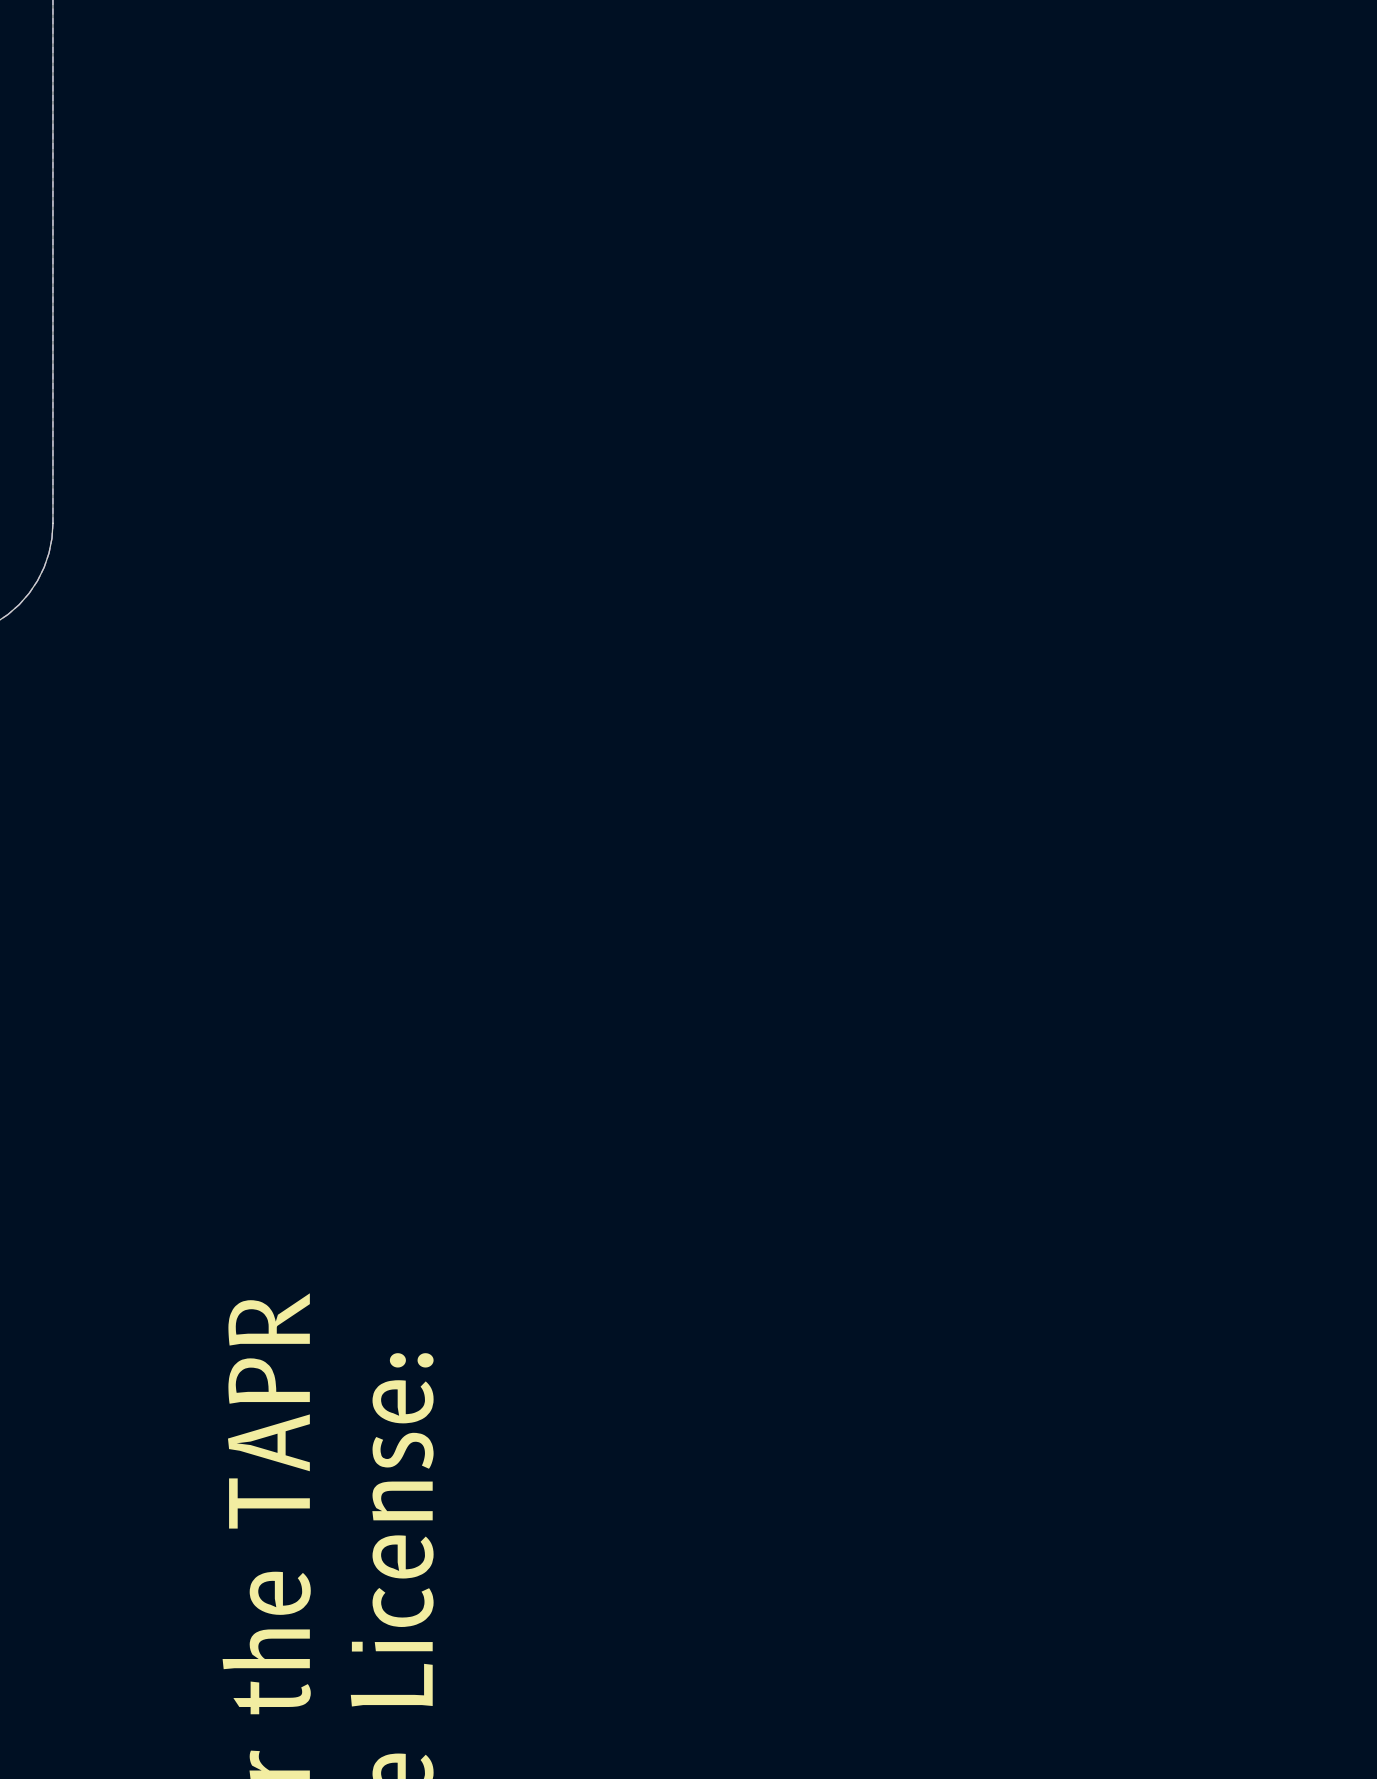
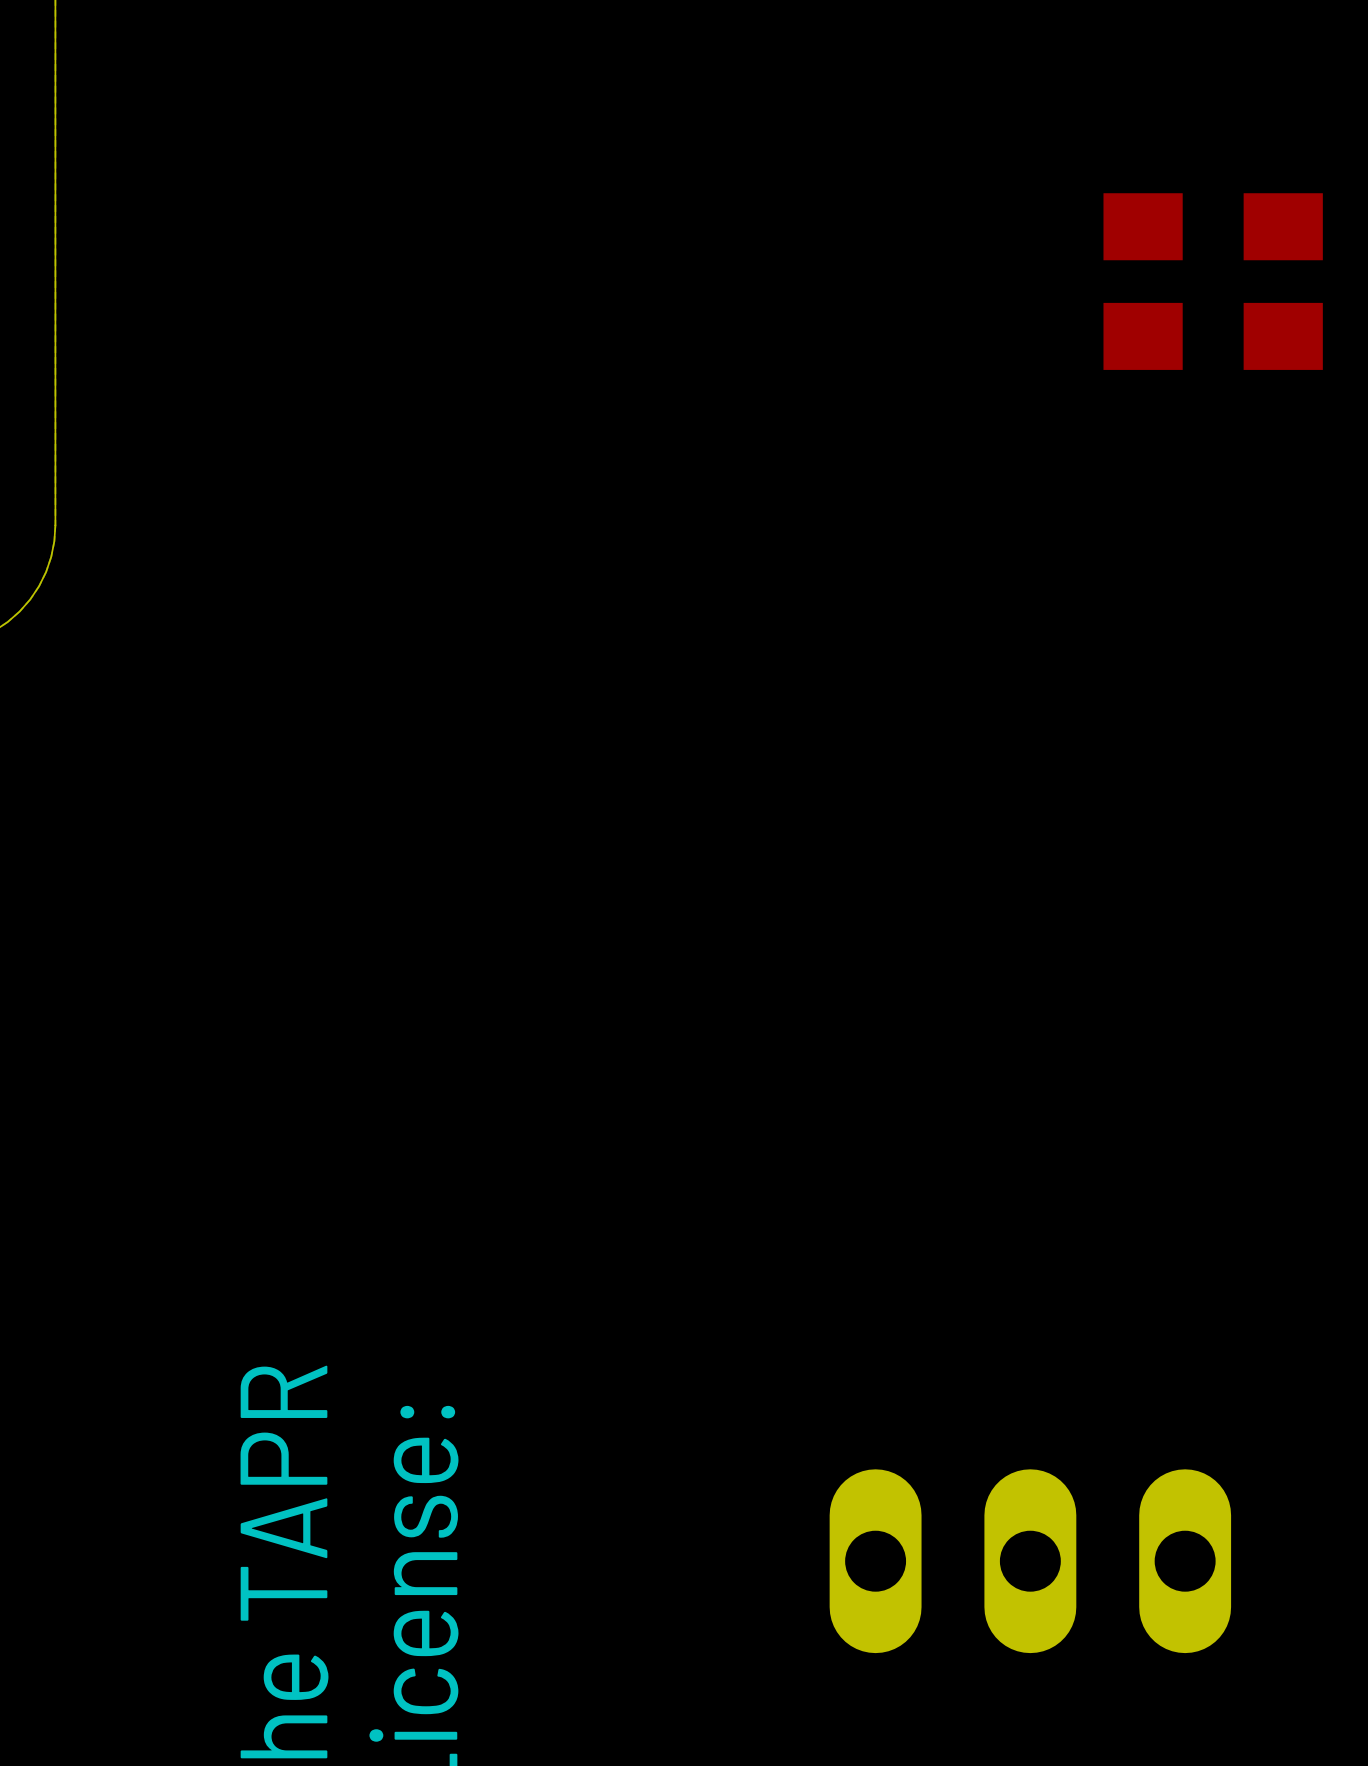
part: none -> (1213, 281)
part: none -> (1030, 1561)

